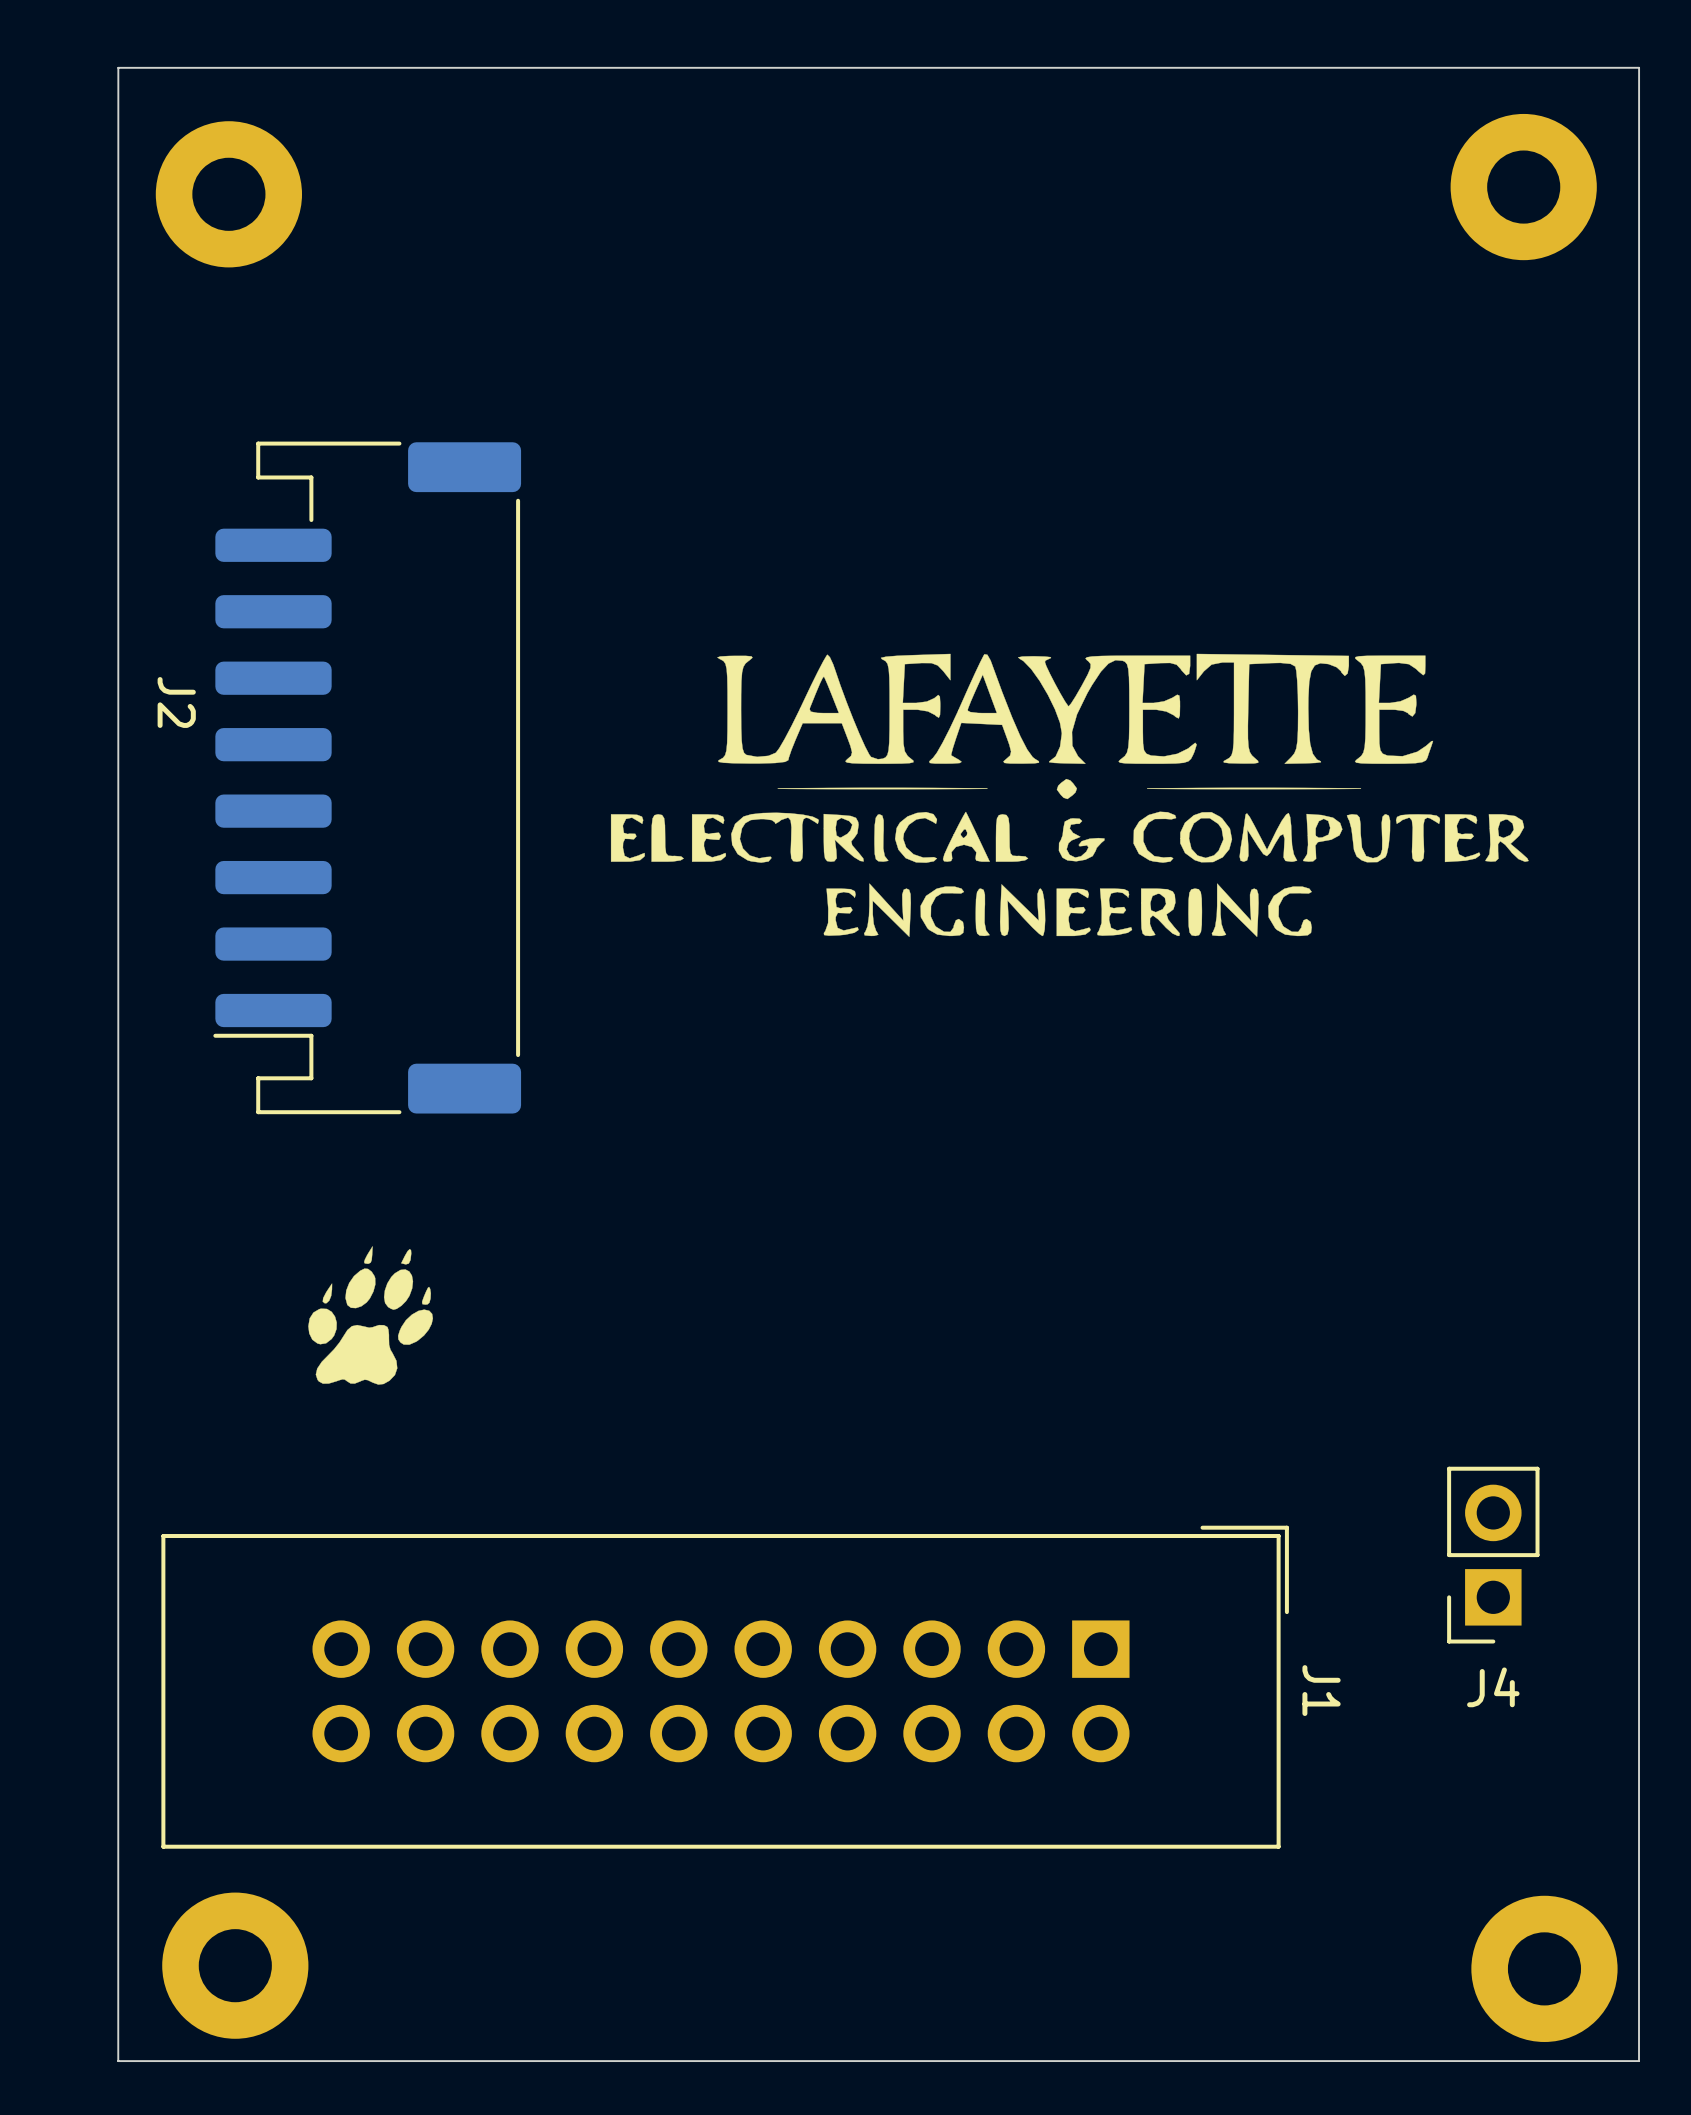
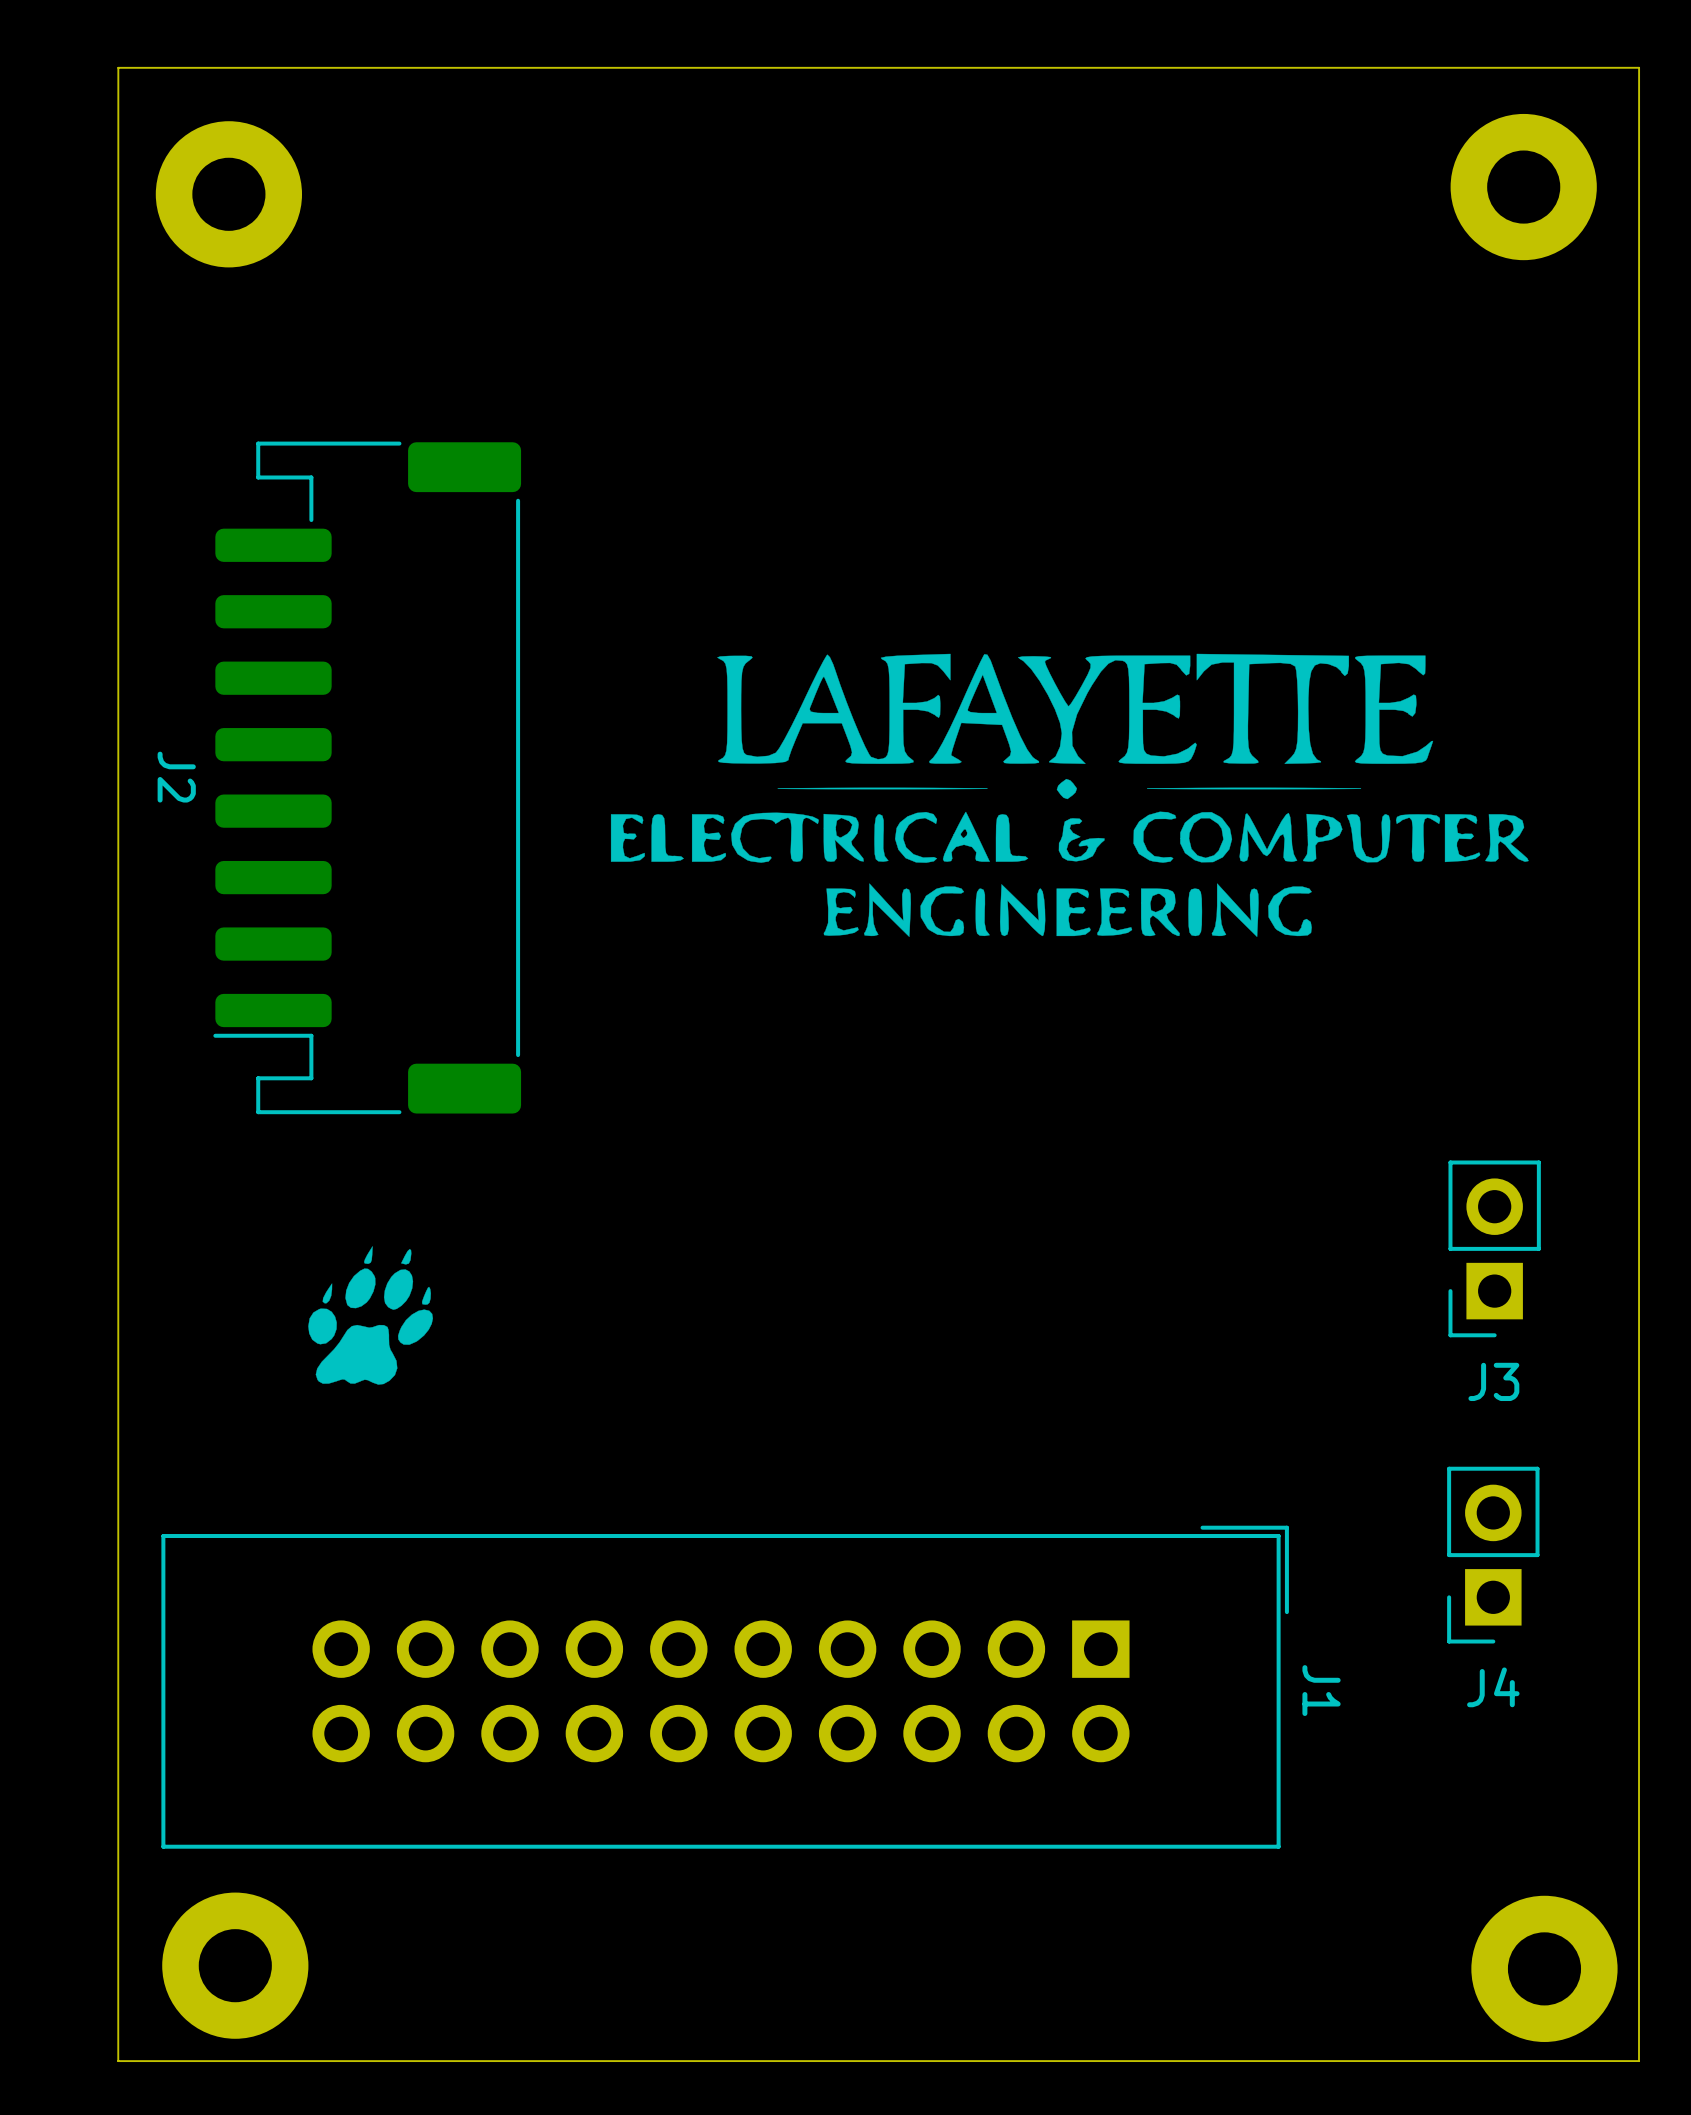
J2 name position: J2 (176, 702) -> J2 (176, 777)
J3: none -> (1494, 1248)

